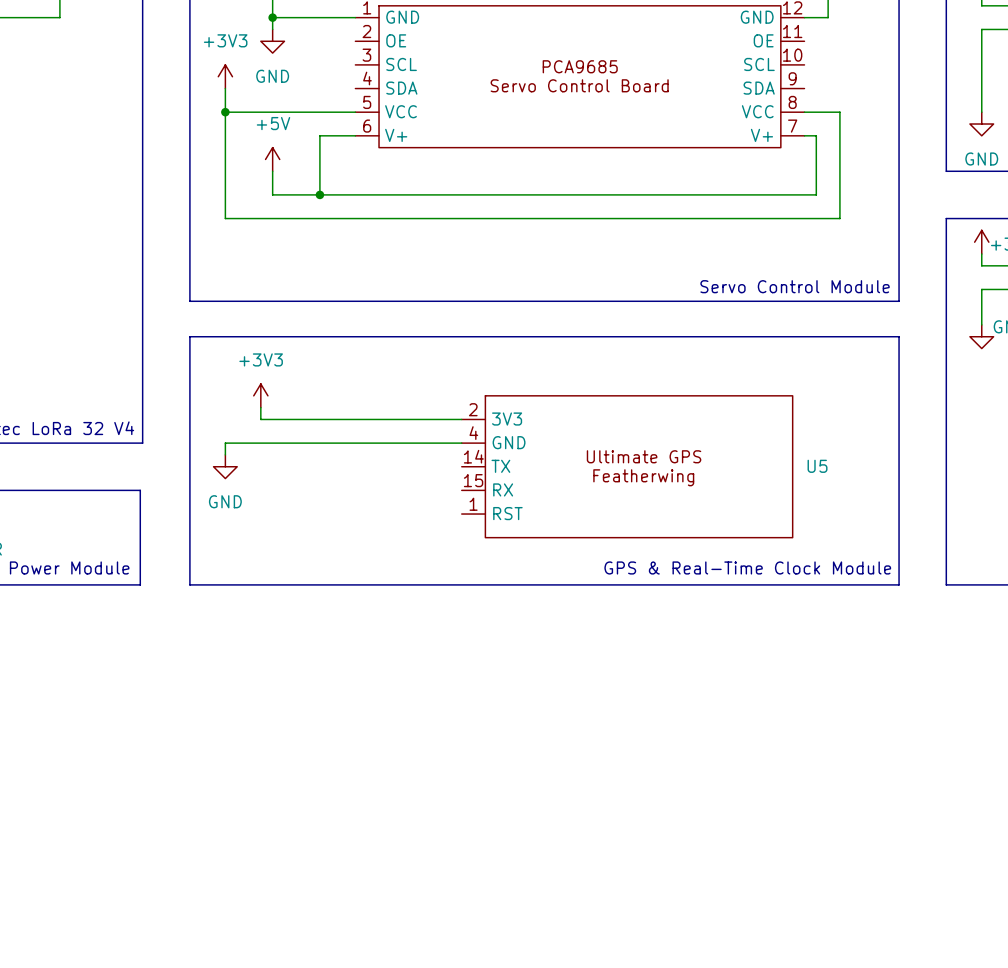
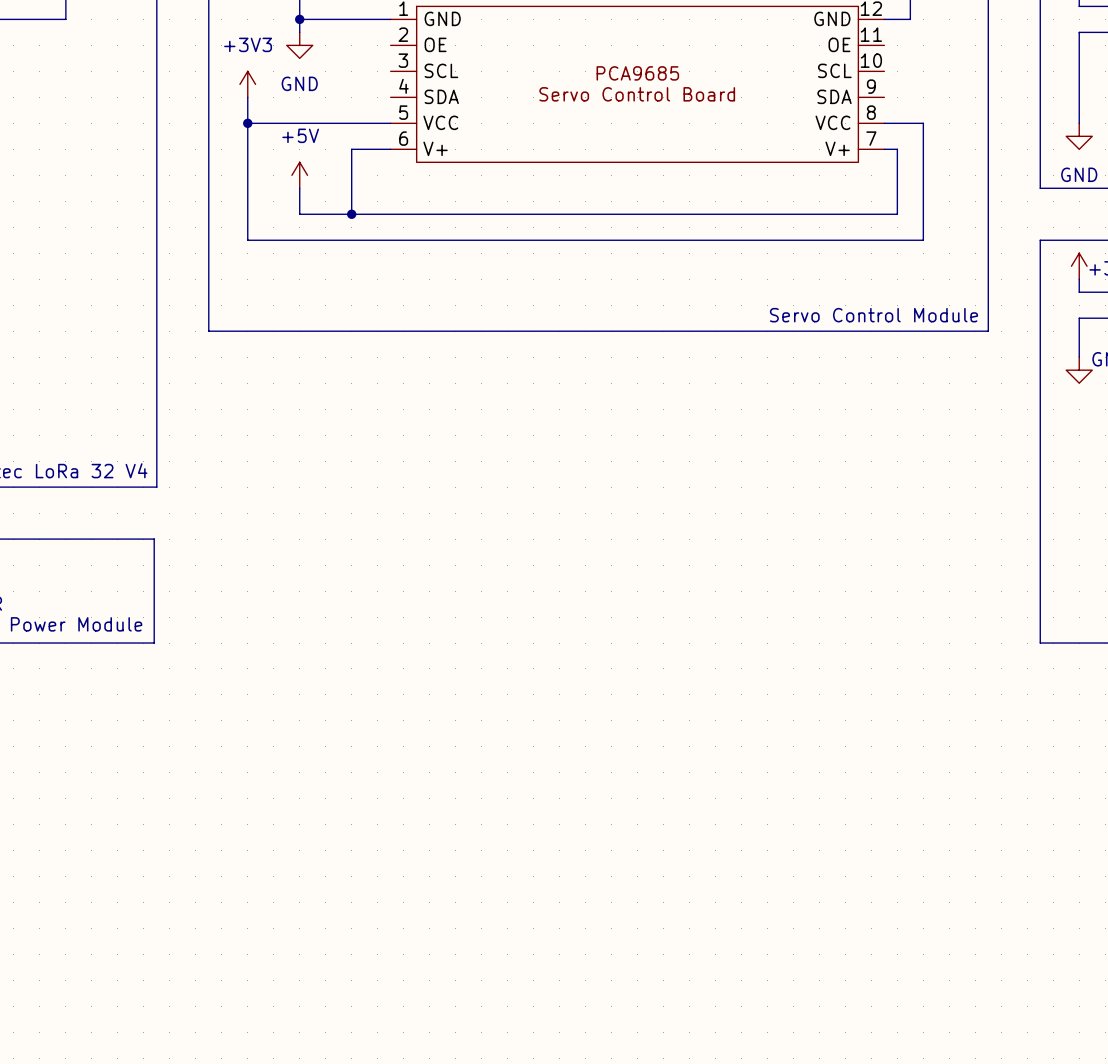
line: (189, 336) (899, 336) (899, 584) (189, 584) (189, 336) -> none
power symbol: +3V3 (260, 395) -> none
wire: (260, 407) (260, 419) (461, 419) -> none
wire: (461, 443) (225, 443) (225, 454) -> none
power symbol: GND (225, 466) -> none
U5: (627, 466) -> none
text: GPS & Real-Time Clock Module (747, 567) -> none

